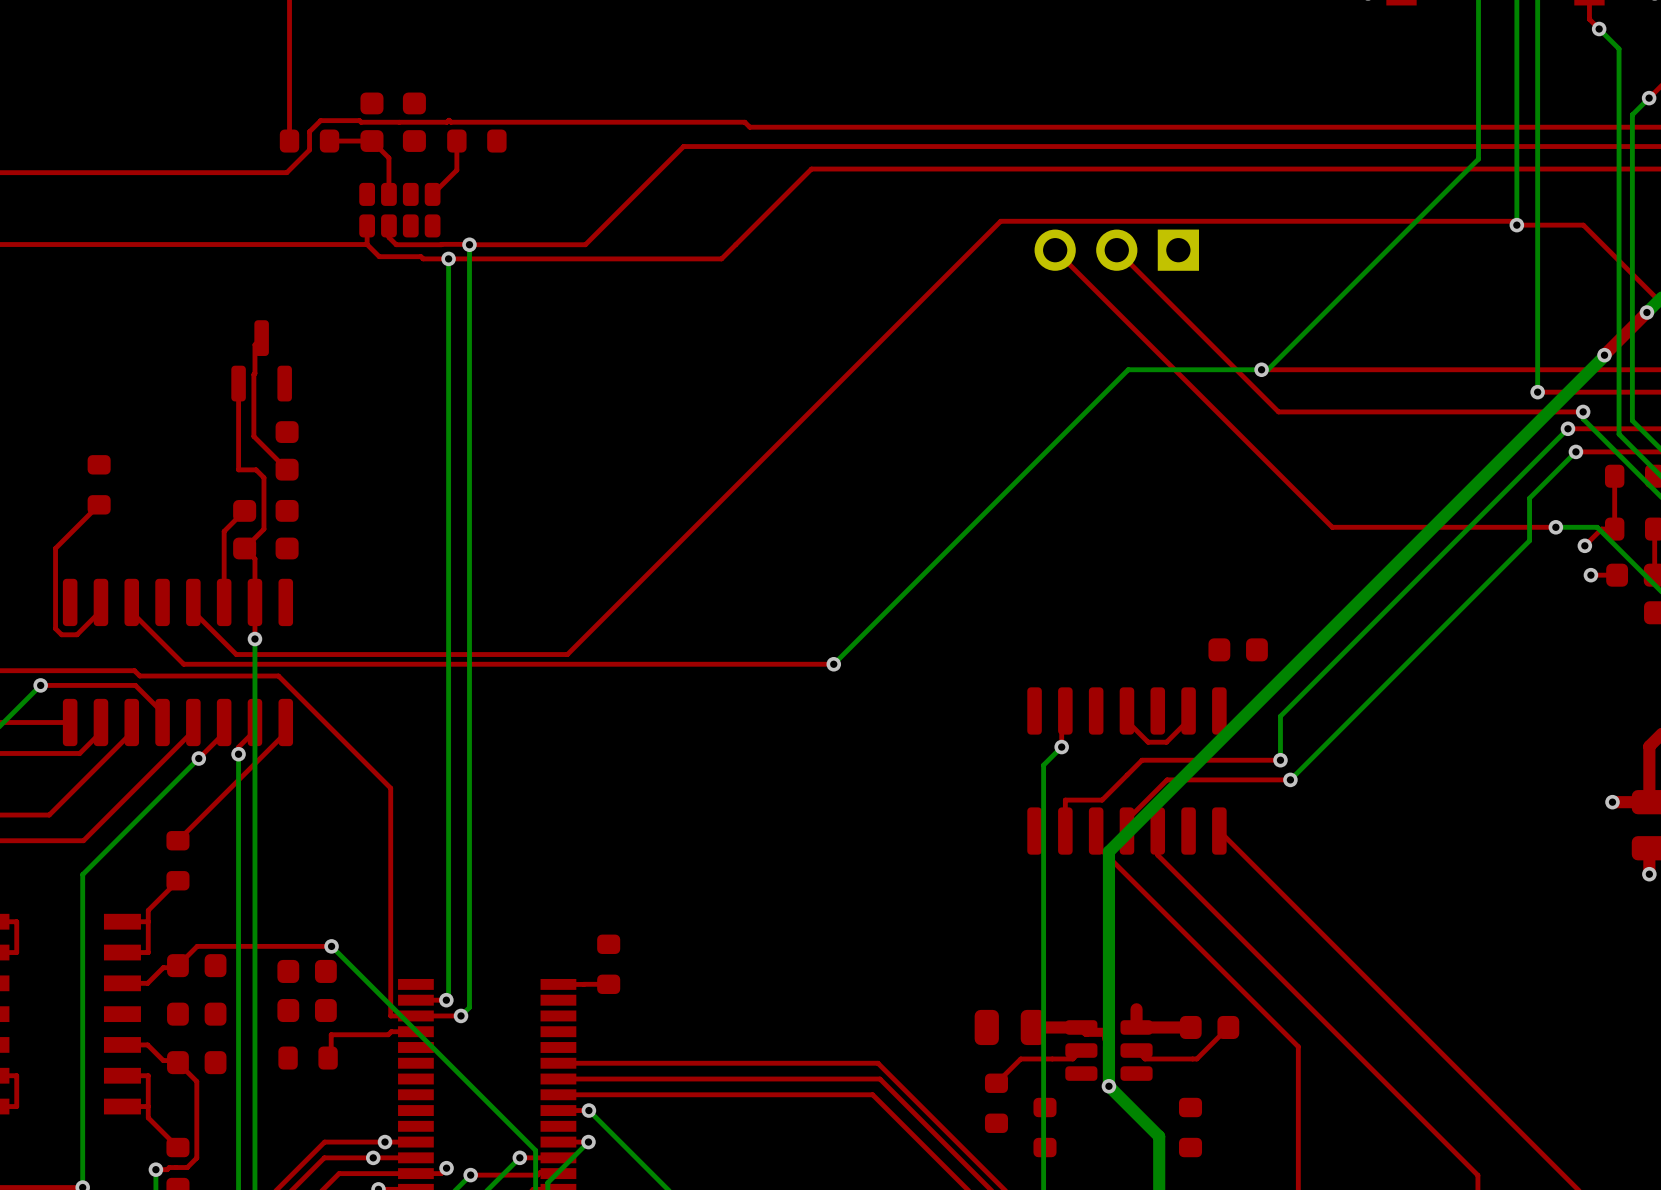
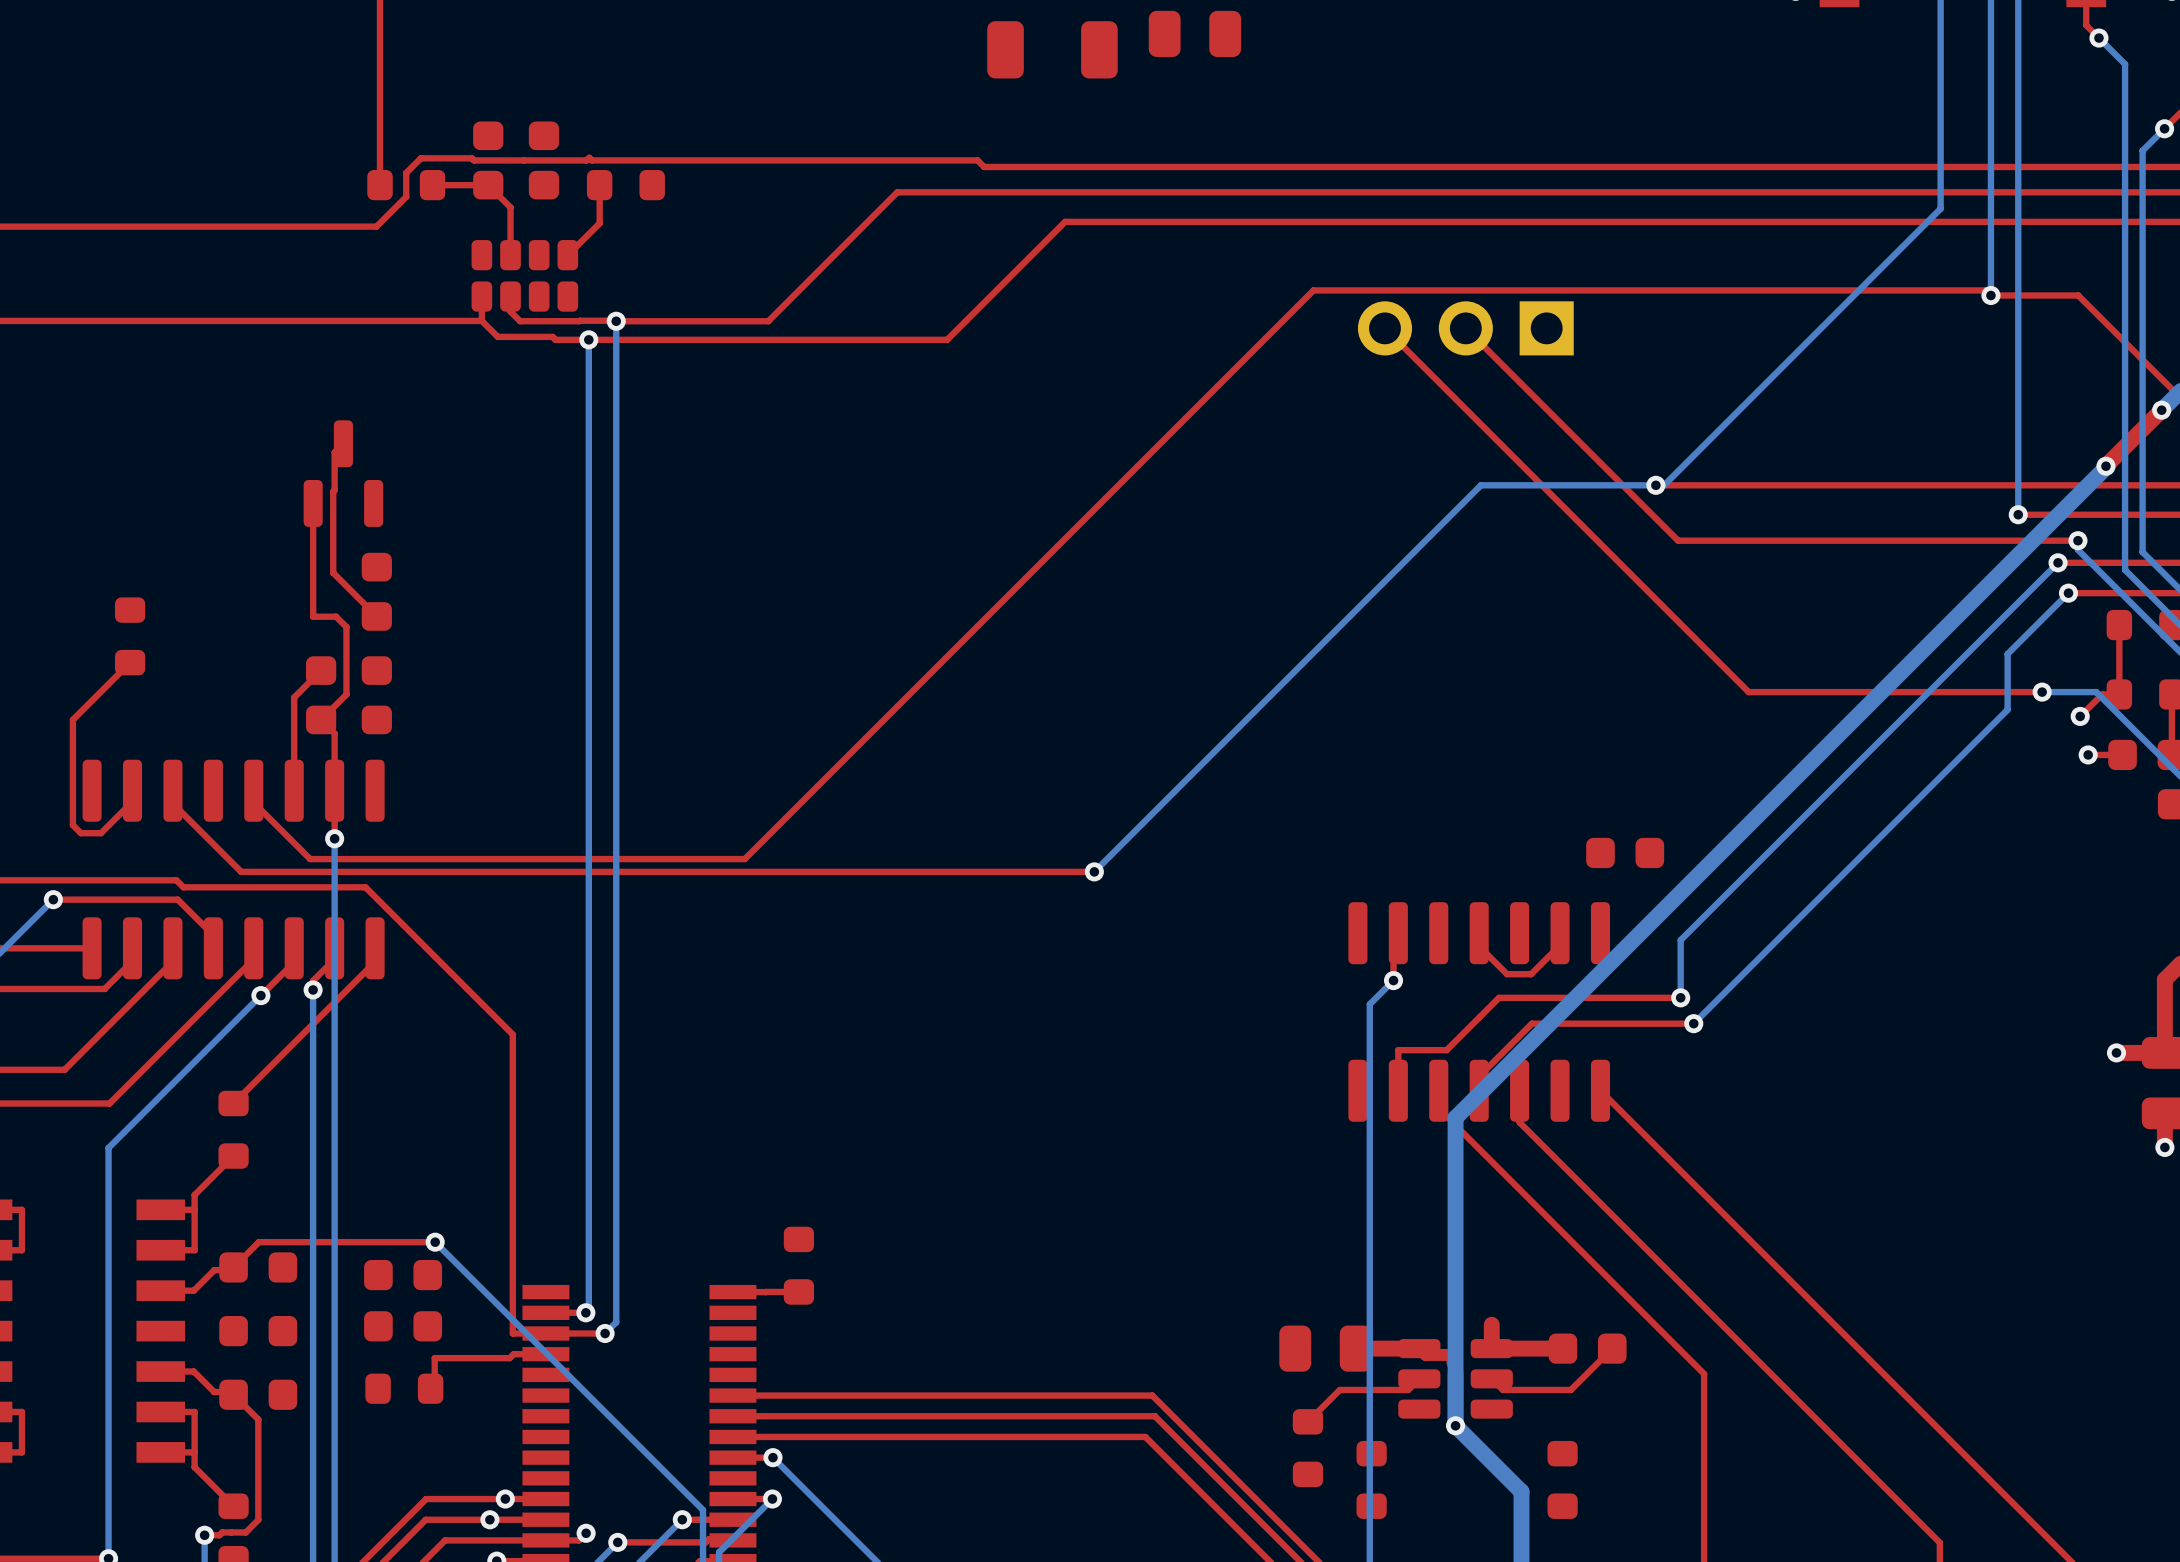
part: none -> (1194, 33)
part: none -> (1052, 49)

